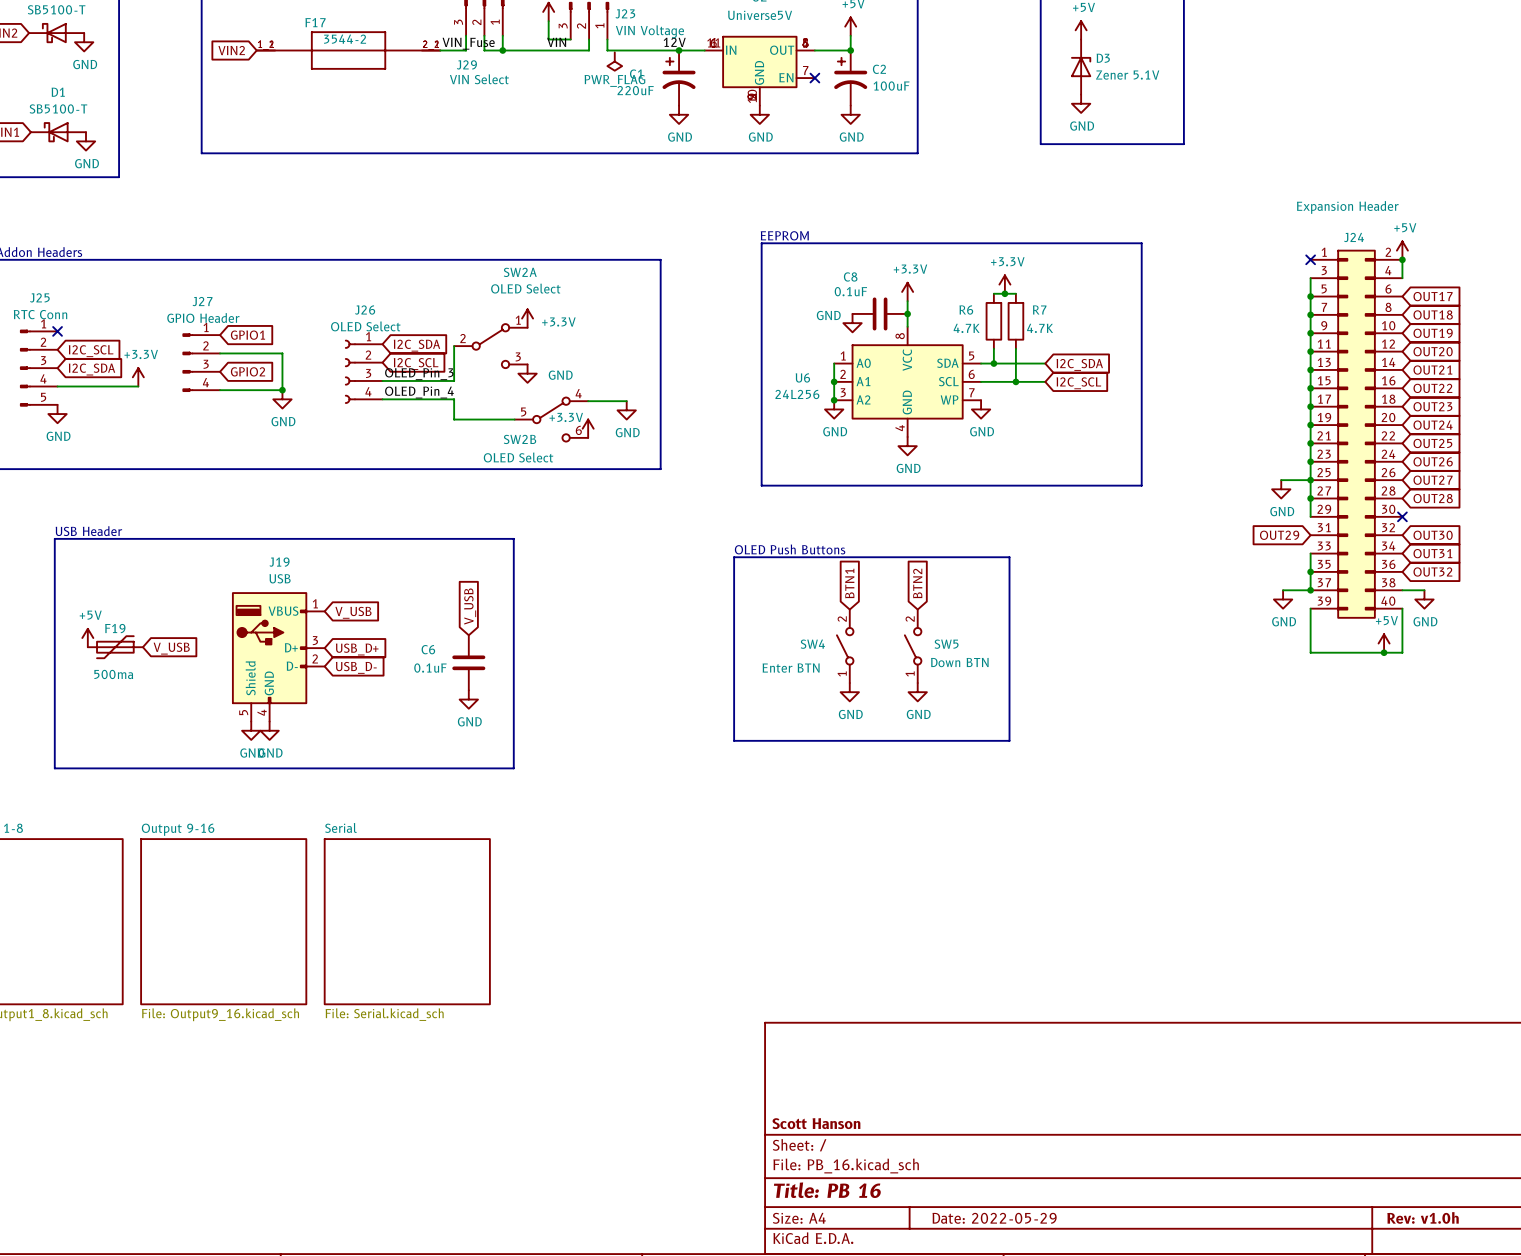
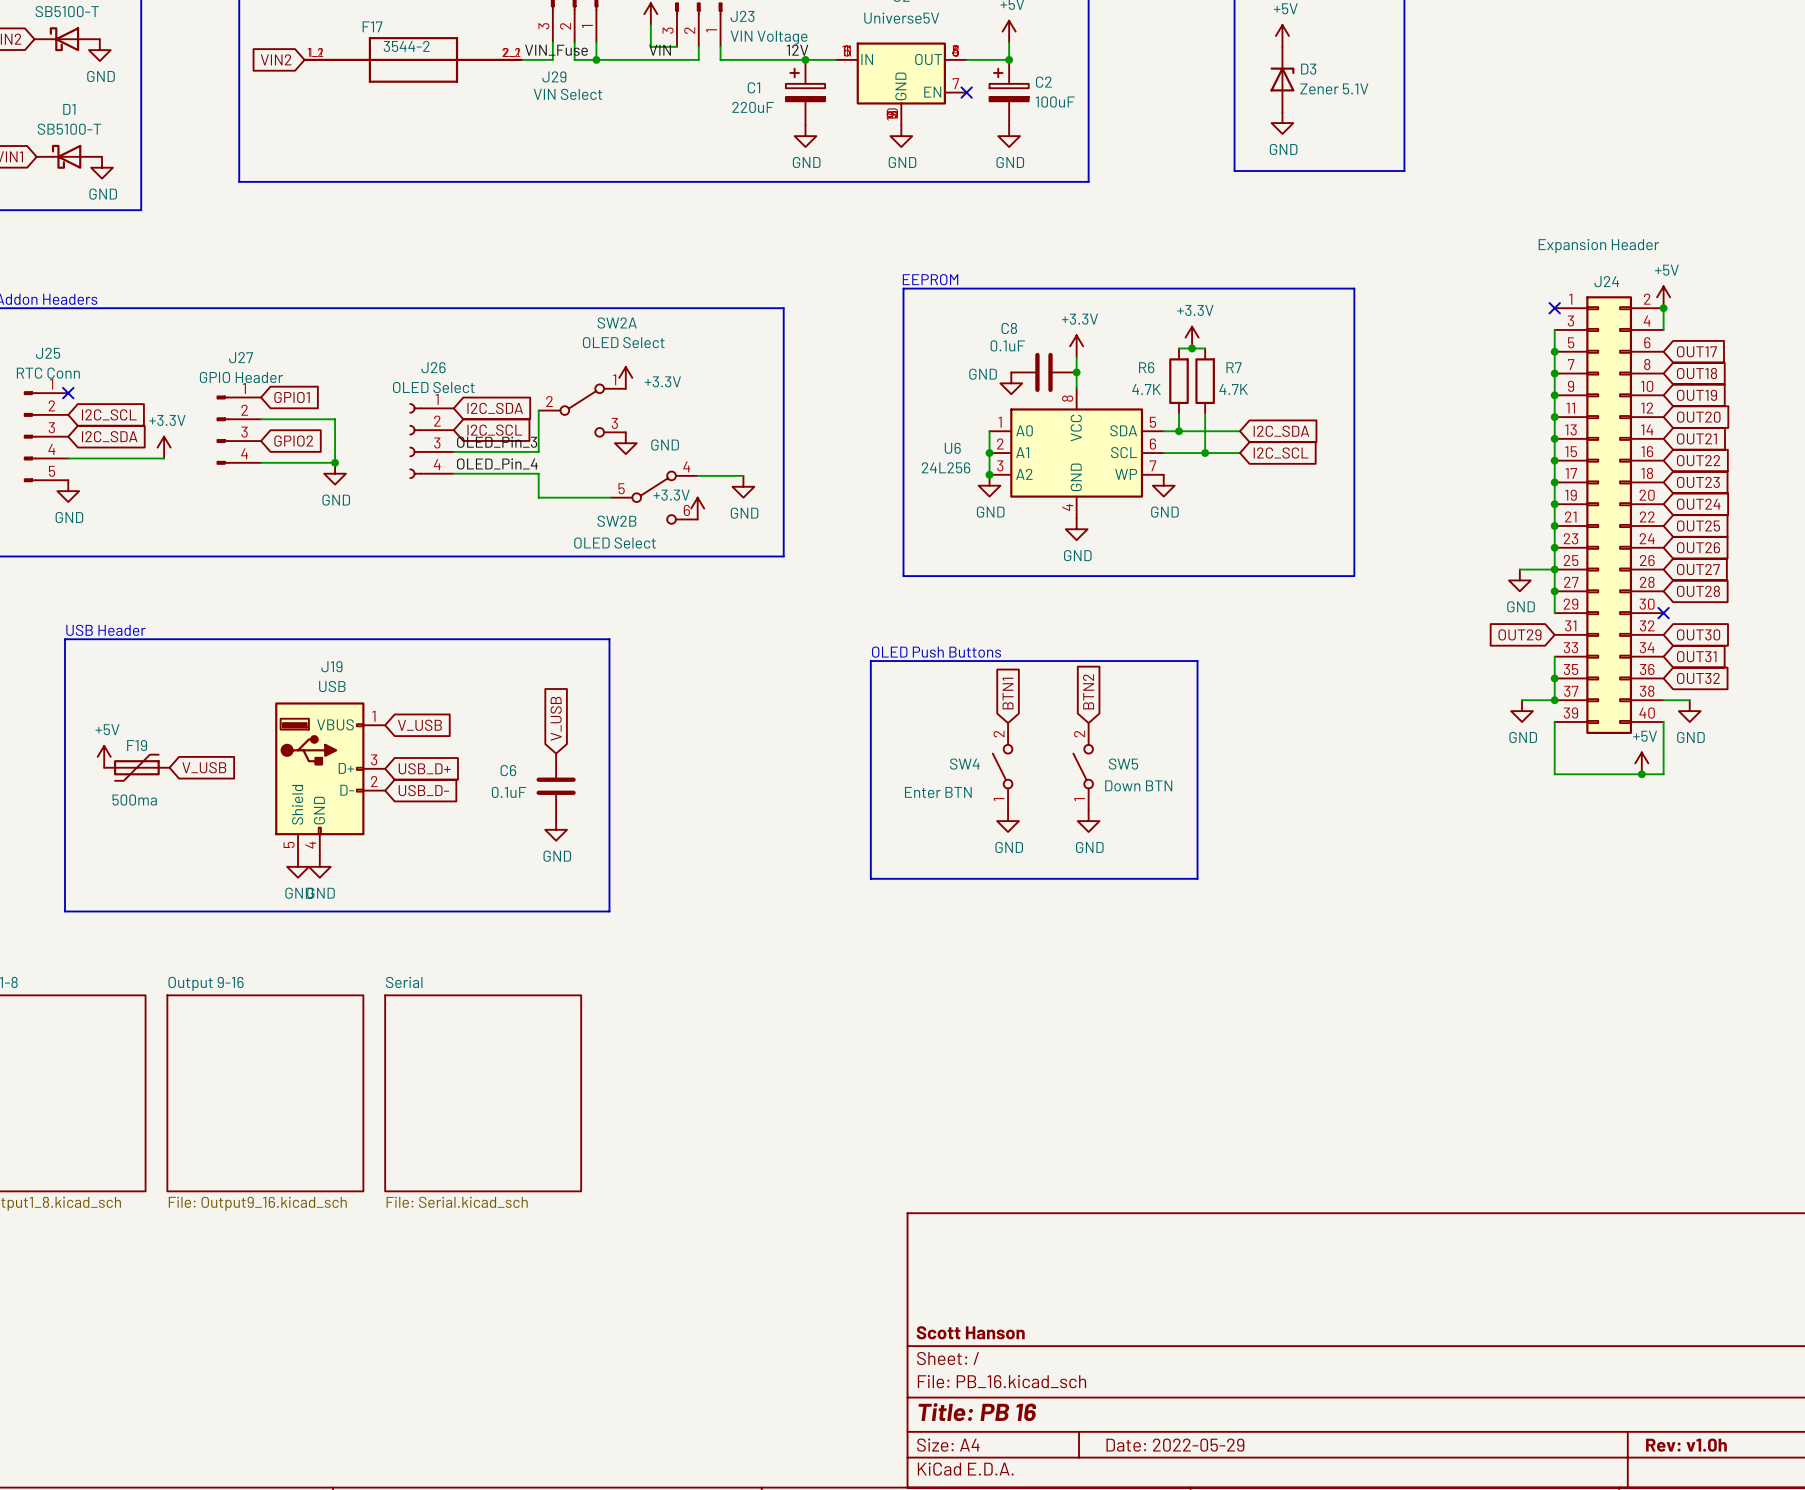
C1 symbol: [662, 50, 696, 106] -> [785, 59, 826, 126]
C2 symbol: [834, 50, 868, 106] -> [989, 59, 1029, 126]
power symbol: PWR_FLAG (614, 61) -> none

